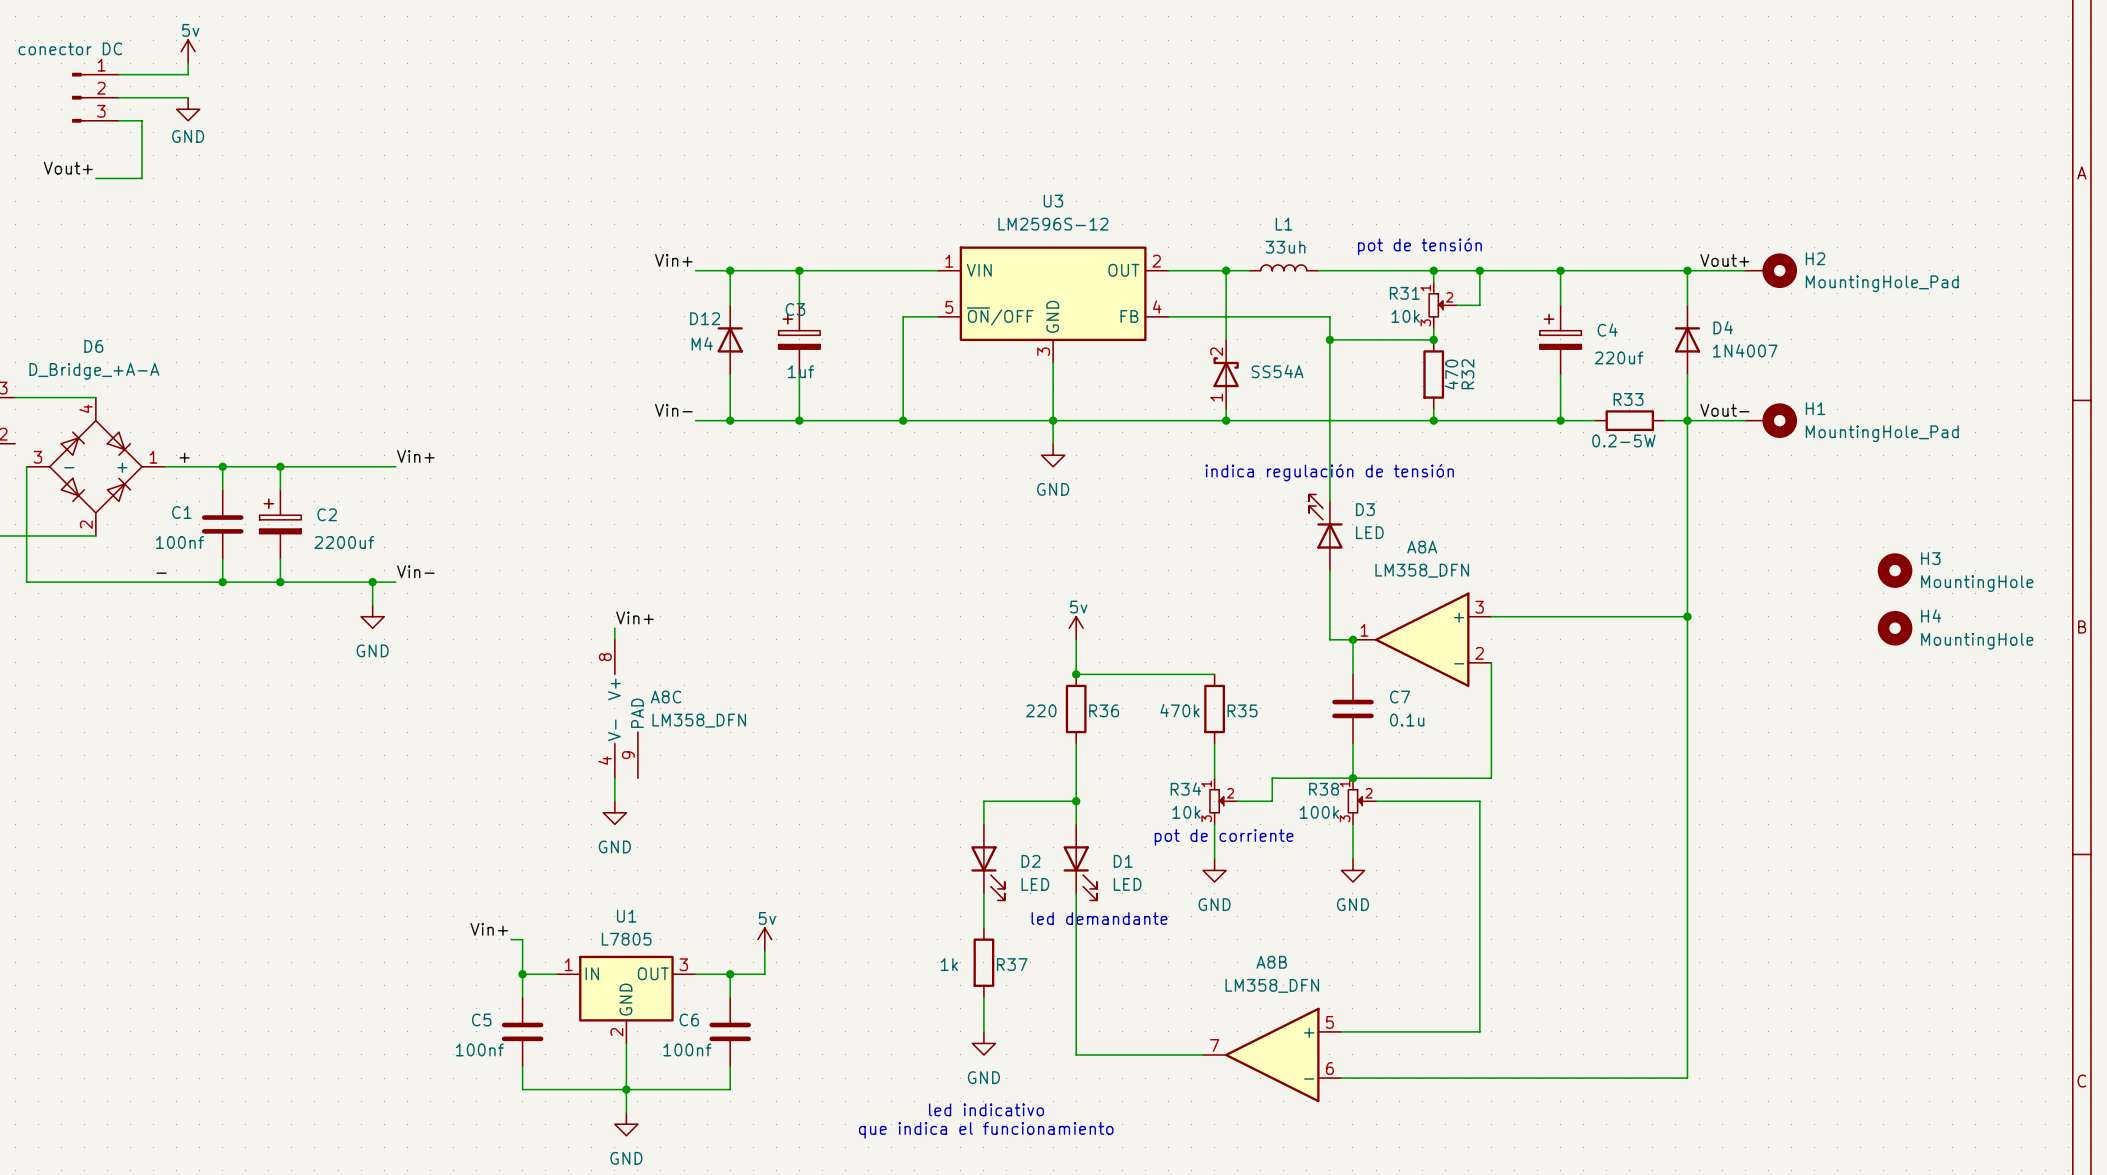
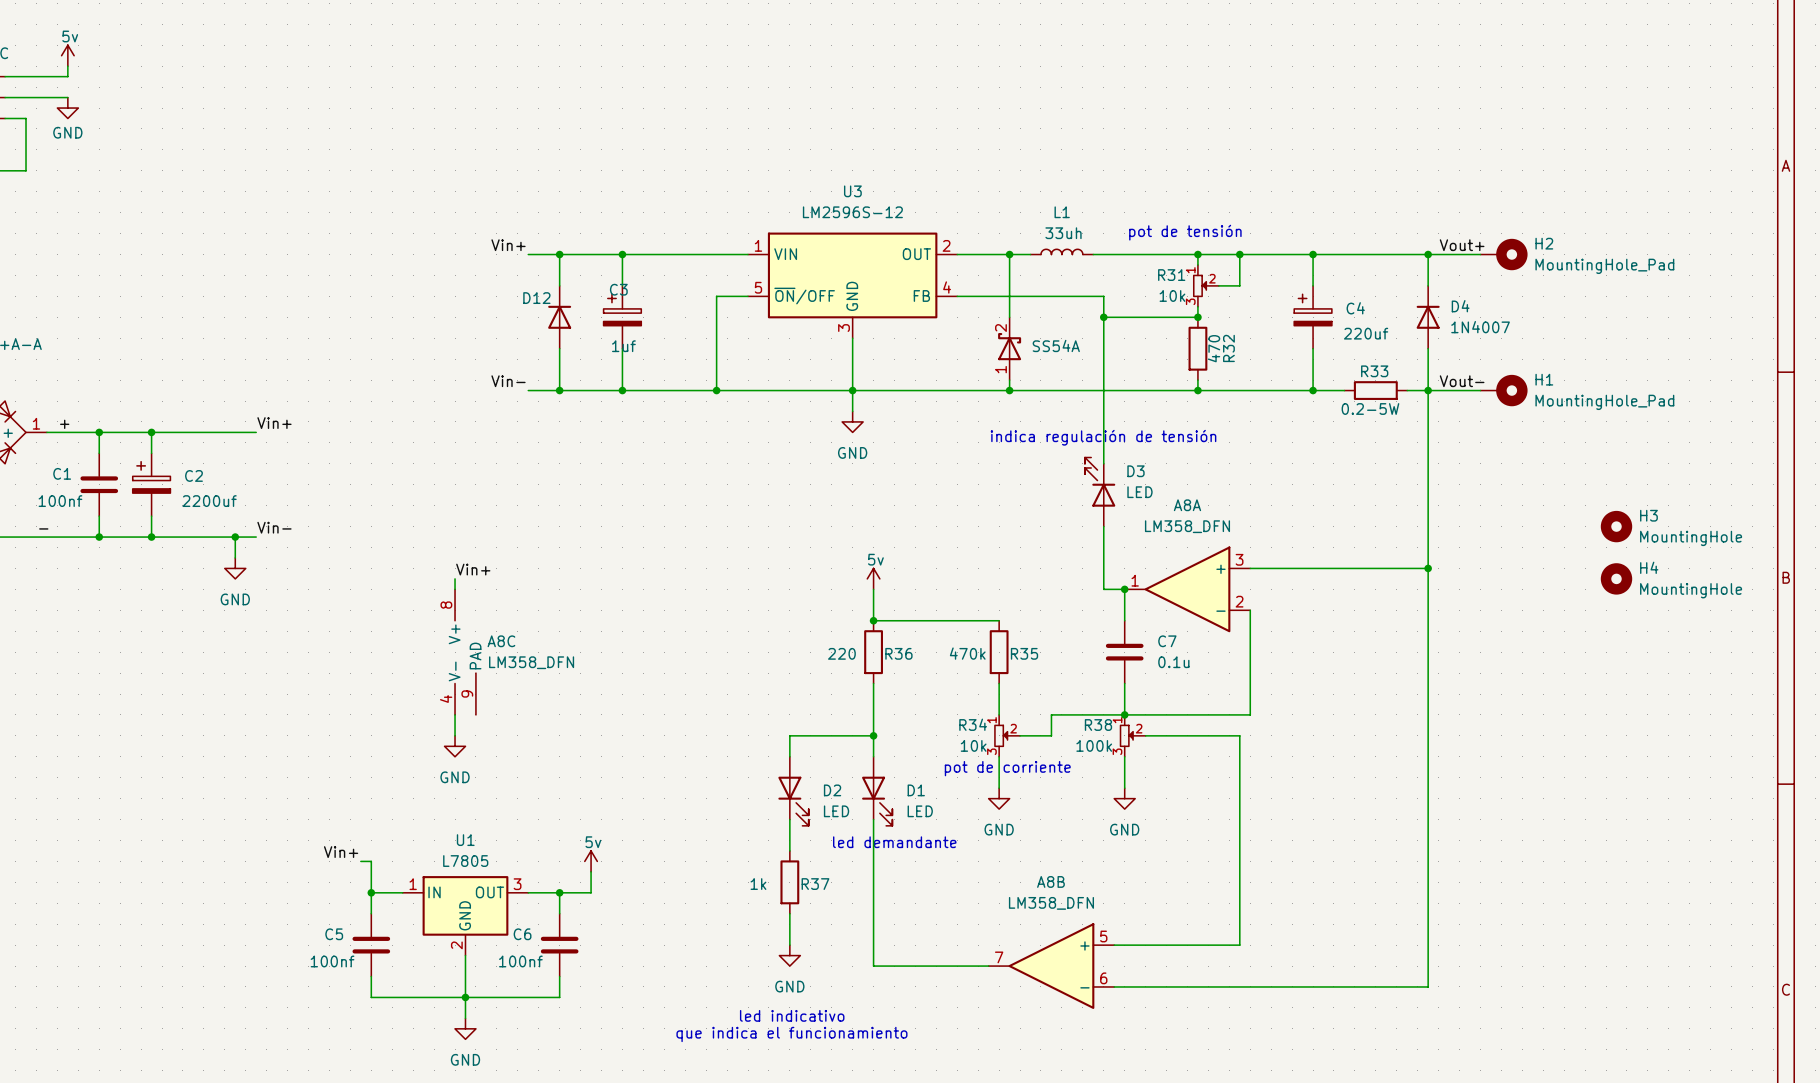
D12 value: M4 (702, 343) -> none

